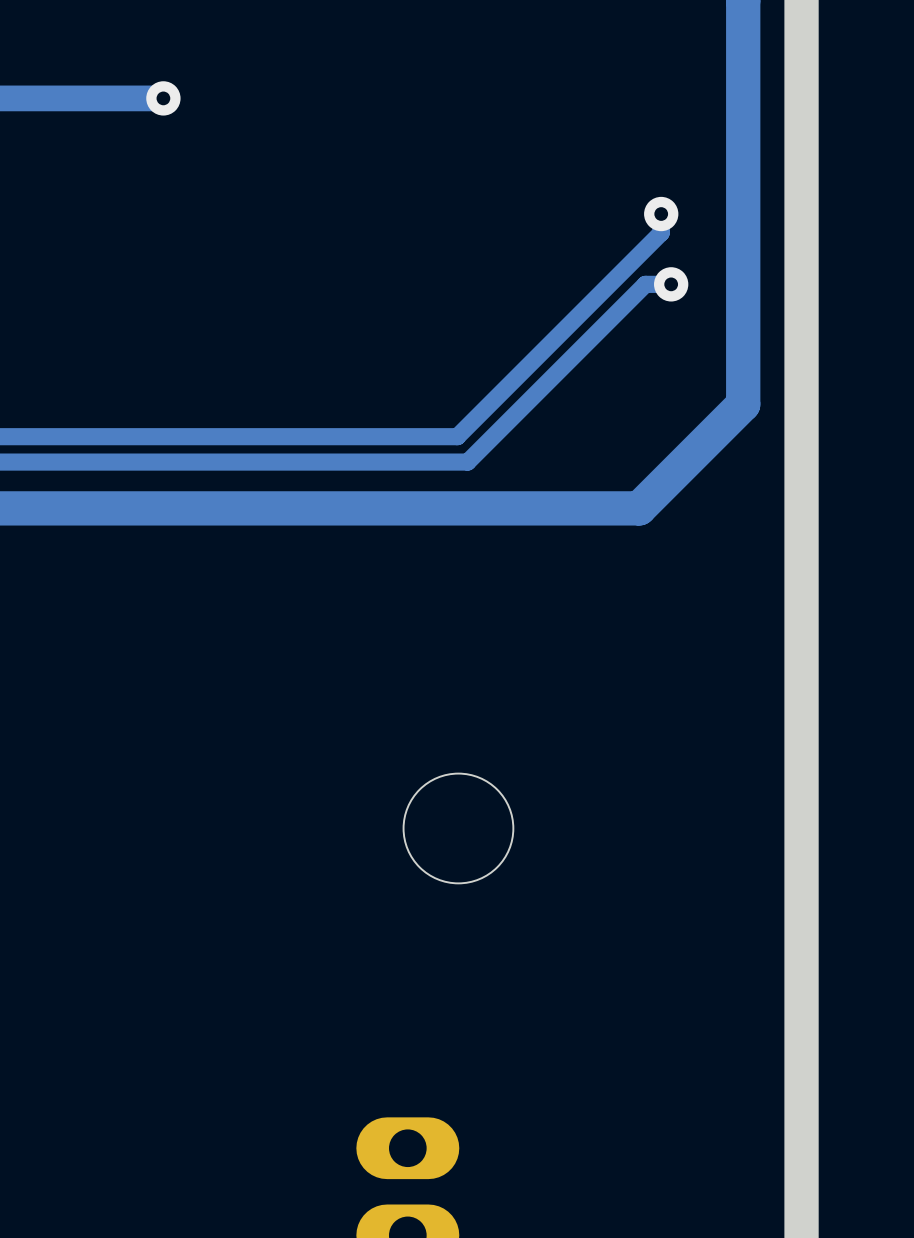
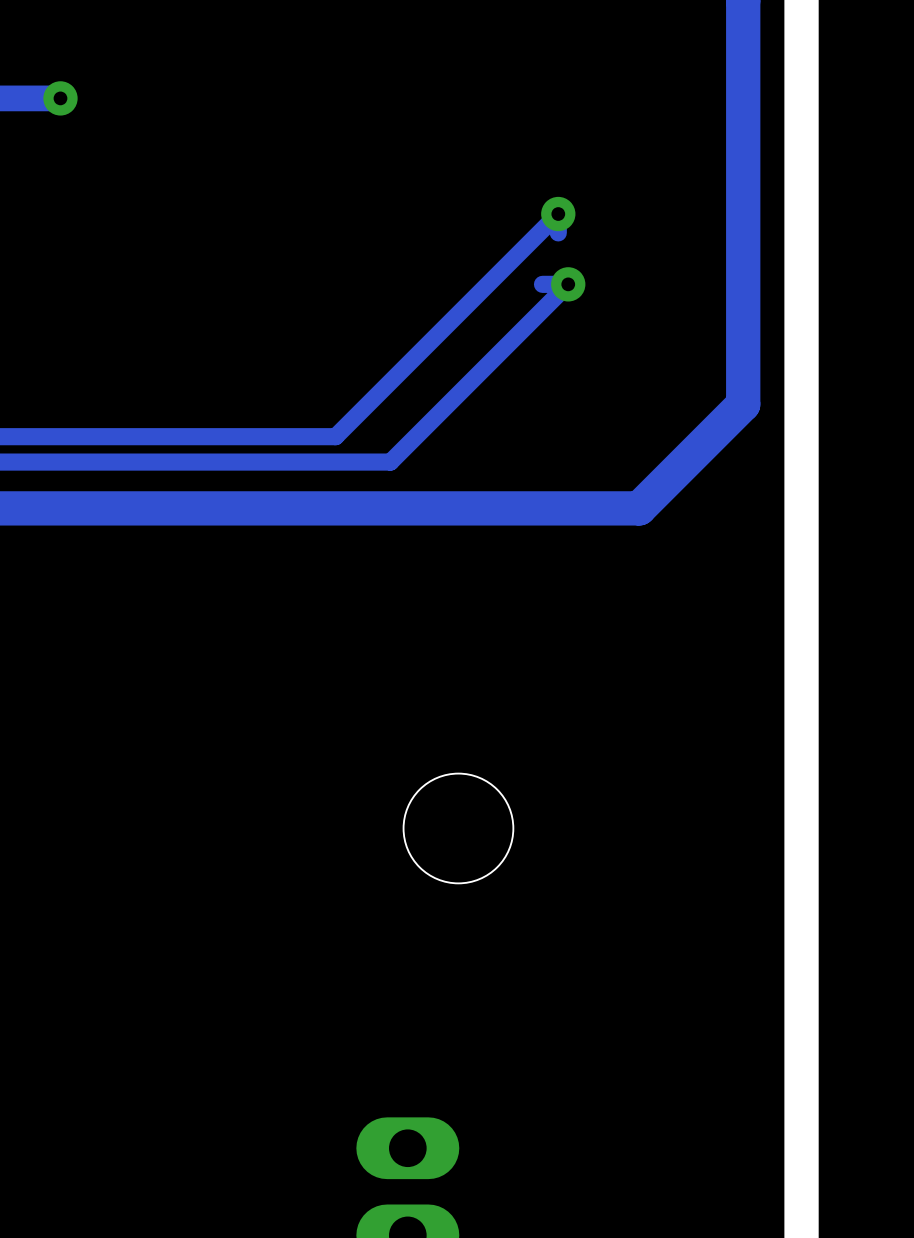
track: (163, 98) (60, 98) -> none
via position: (163, 98) -> (60, 98)
via: none -> (558, 214)
track: (661, 214) (661, 232) (457, 436) (335, 436) -> (558, 232) (558, 214) (335, 436)
via: (661, 214) -> none
via: none -> (568, 284)
track: (671, 284) (645, 284) (467, 462) (390, 462) -> (542, 284) (568, 284) (390, 462)
via: (671, 284) -> none

